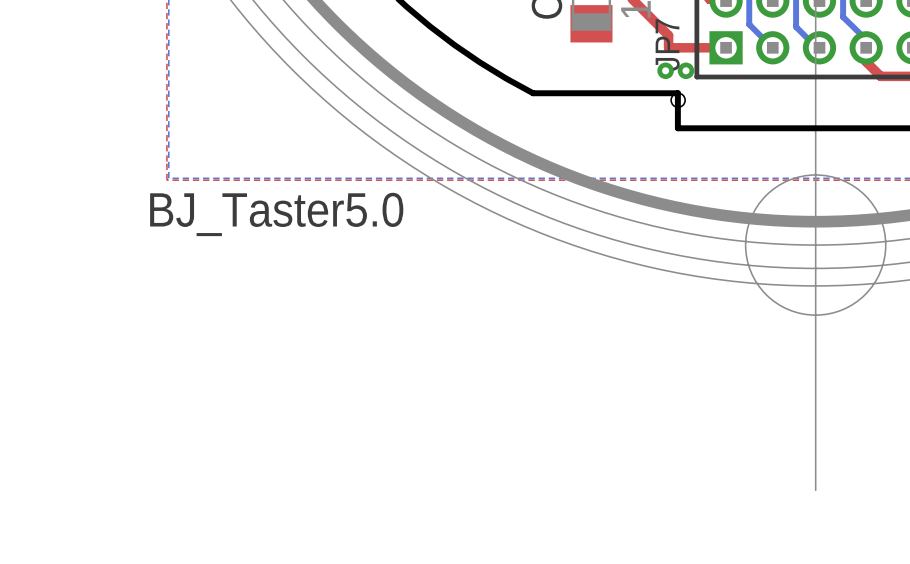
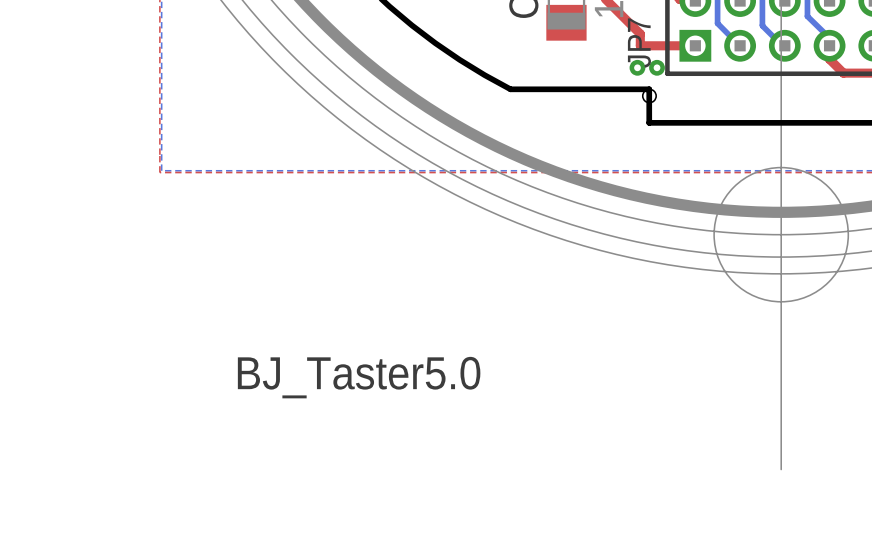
text position: BJ_Taster5.0 (276, 214) -> BJ_Taster5.0 (359, 377)

